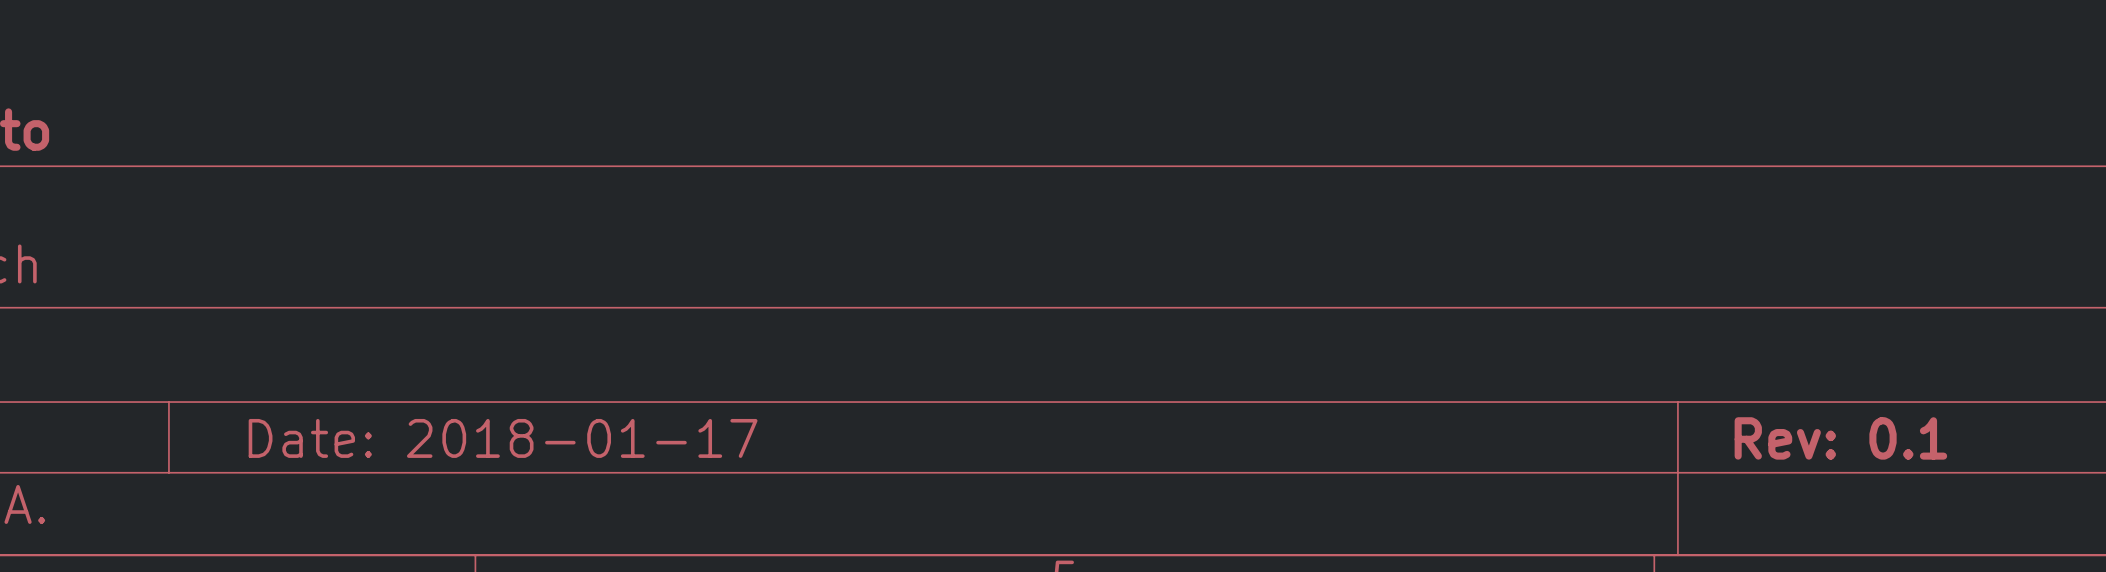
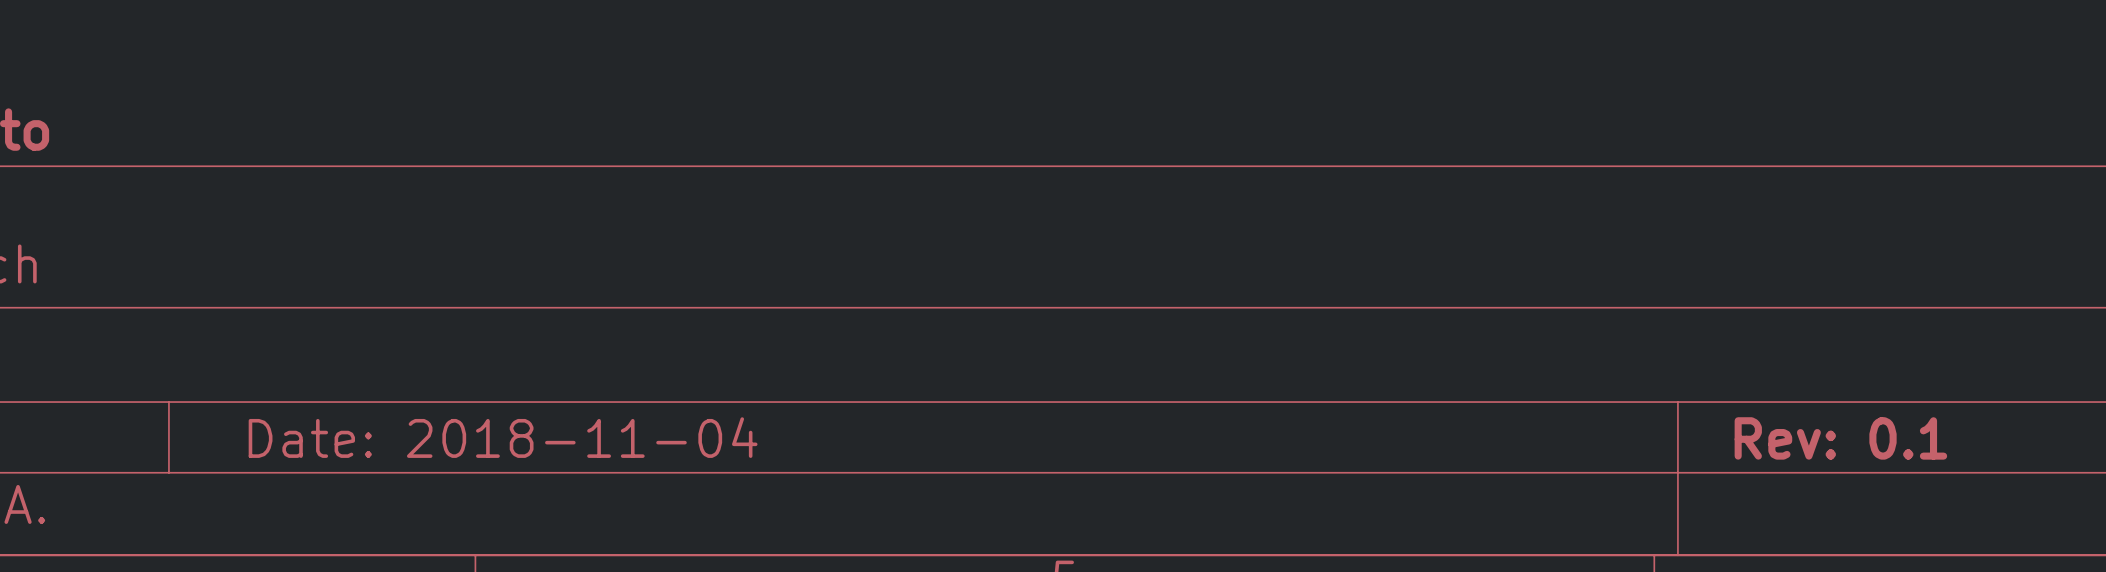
title block: Date: 2018-01-17 (503, 438) -> Date: 2018-11-04 (503, 437)

